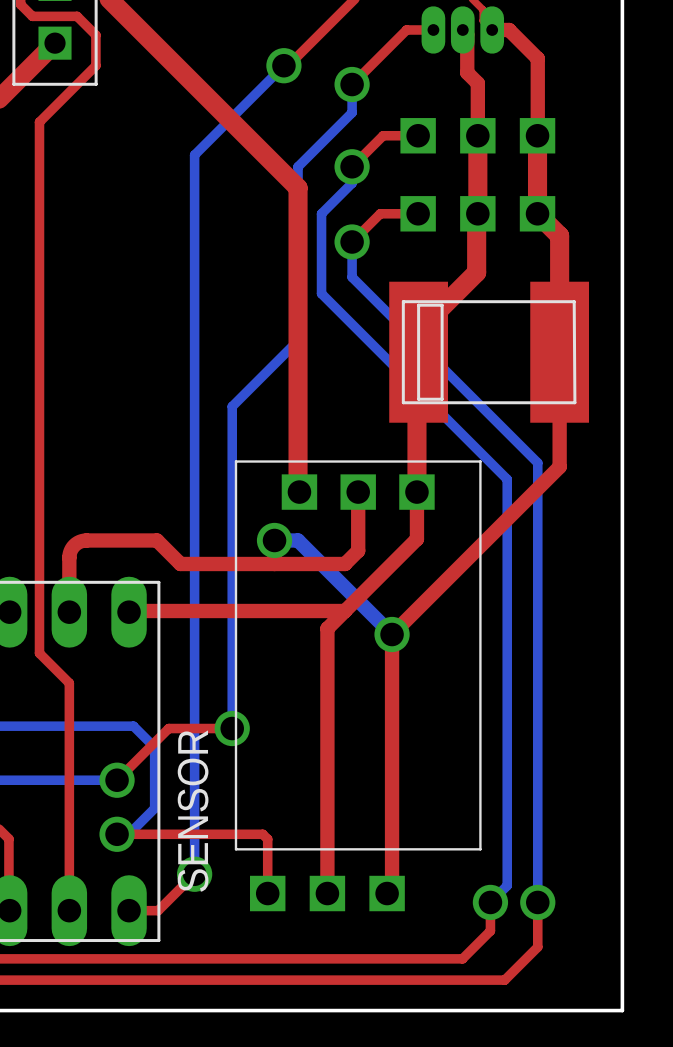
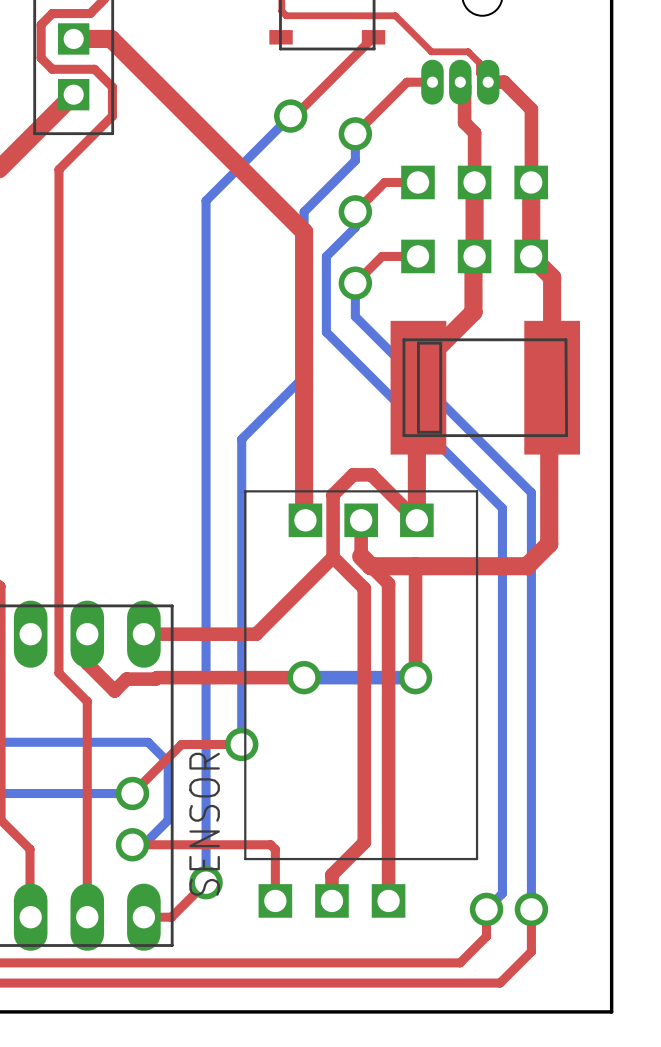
top track: (559, 352) (559, 466) (392, 634) (392, 888) (387, 893) -> (552, 387) (549, 390) (549, 543) (526, 566) (370, 566) (361, 556) (388, 583) (388, 900)
top track: (416, 492) (416, 539) (327, 628) (327, 866) -> (333, 557) (364, 588) (364, 842) (331, 874)
top track: none -> (416, 520) (371, 474) (353, 474) (333, 494) (333, 557)
top track: (358, 530) (358, 550) (345, 563) (180, 563) (157, 540) (82, 541) (74, 545) (69, 555) (69, 612) -> (304, 677) (126, 679) (114, 691) (87, 663) (87, 634)
bottom track: (274, 540) (298, 540) (392, 634) -> none
via: (274, 540) -> none
top track: none -> (415, 566) (415, 677)
top track: (345, 611) (129, 612) -> (333, 557) (256, 634) (143, 634)
via position: (392, 634) -> (415, 677)
bottom track: none -> (304, 677) (415, 677)
via: none -> (304, 677)

